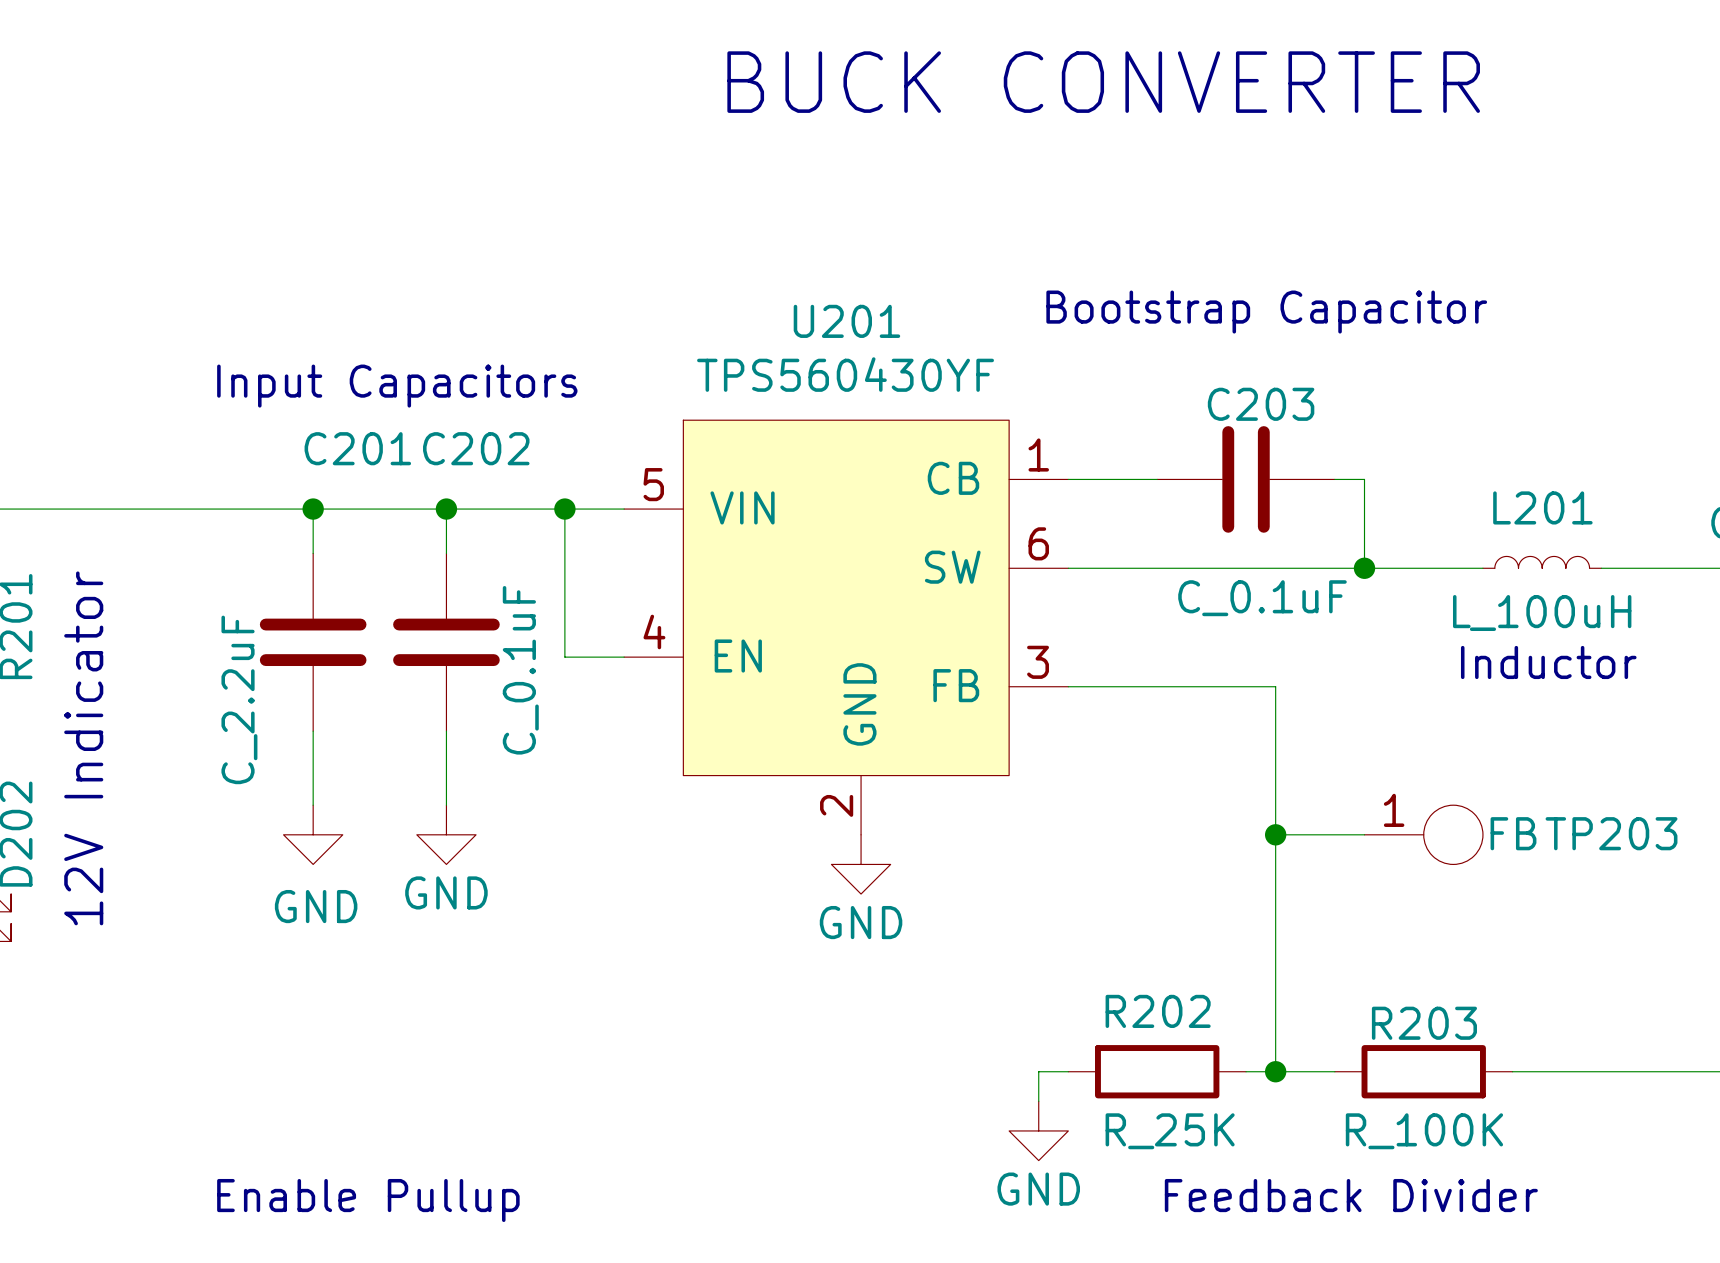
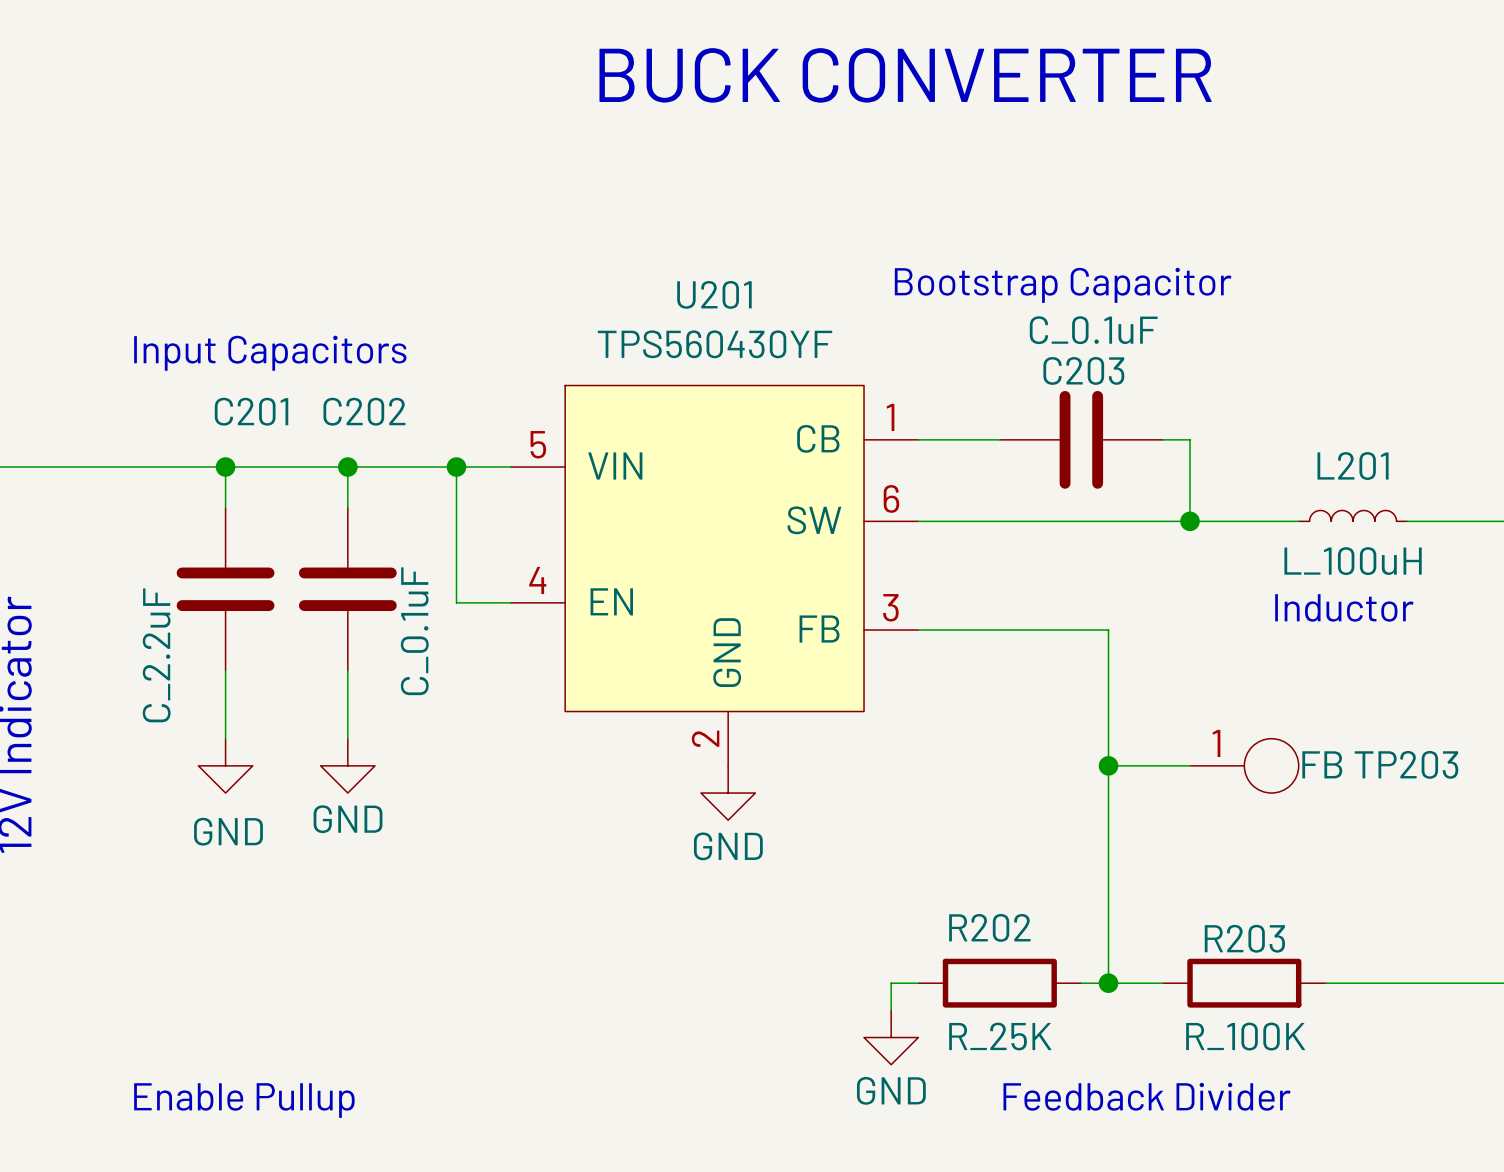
C203 value position: C_0.1uF (1262, 598) -> C_0.1uF (1093, 330)

